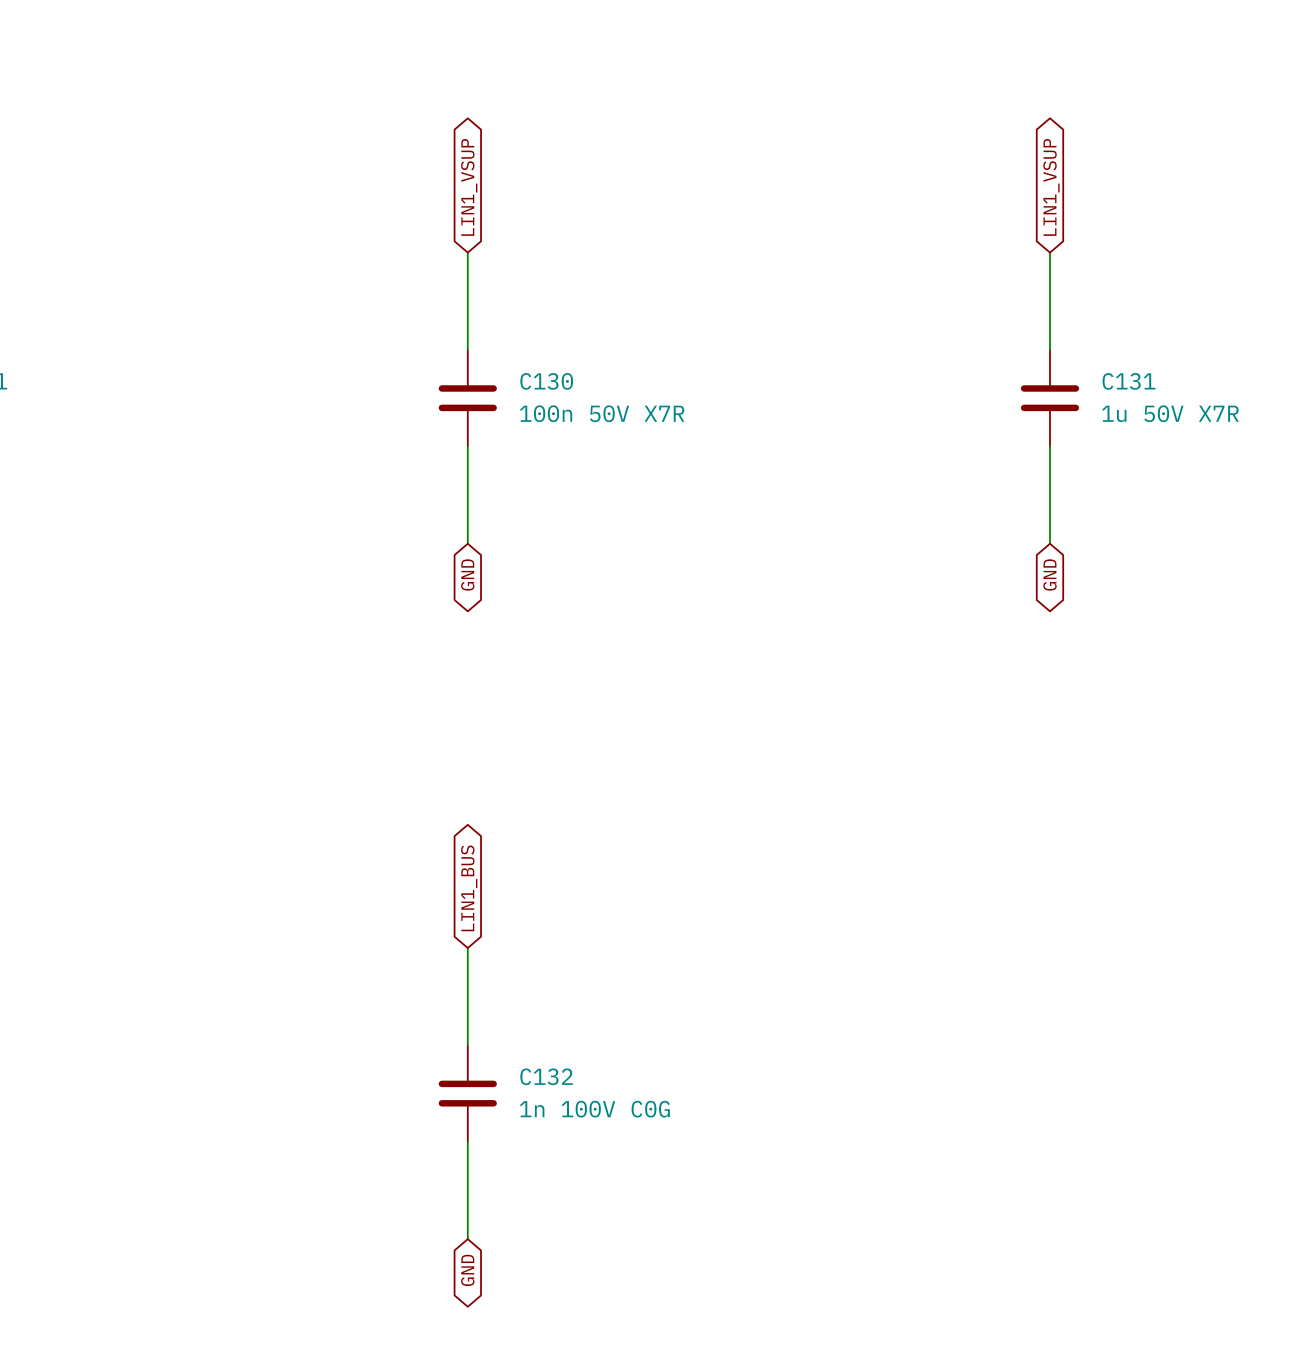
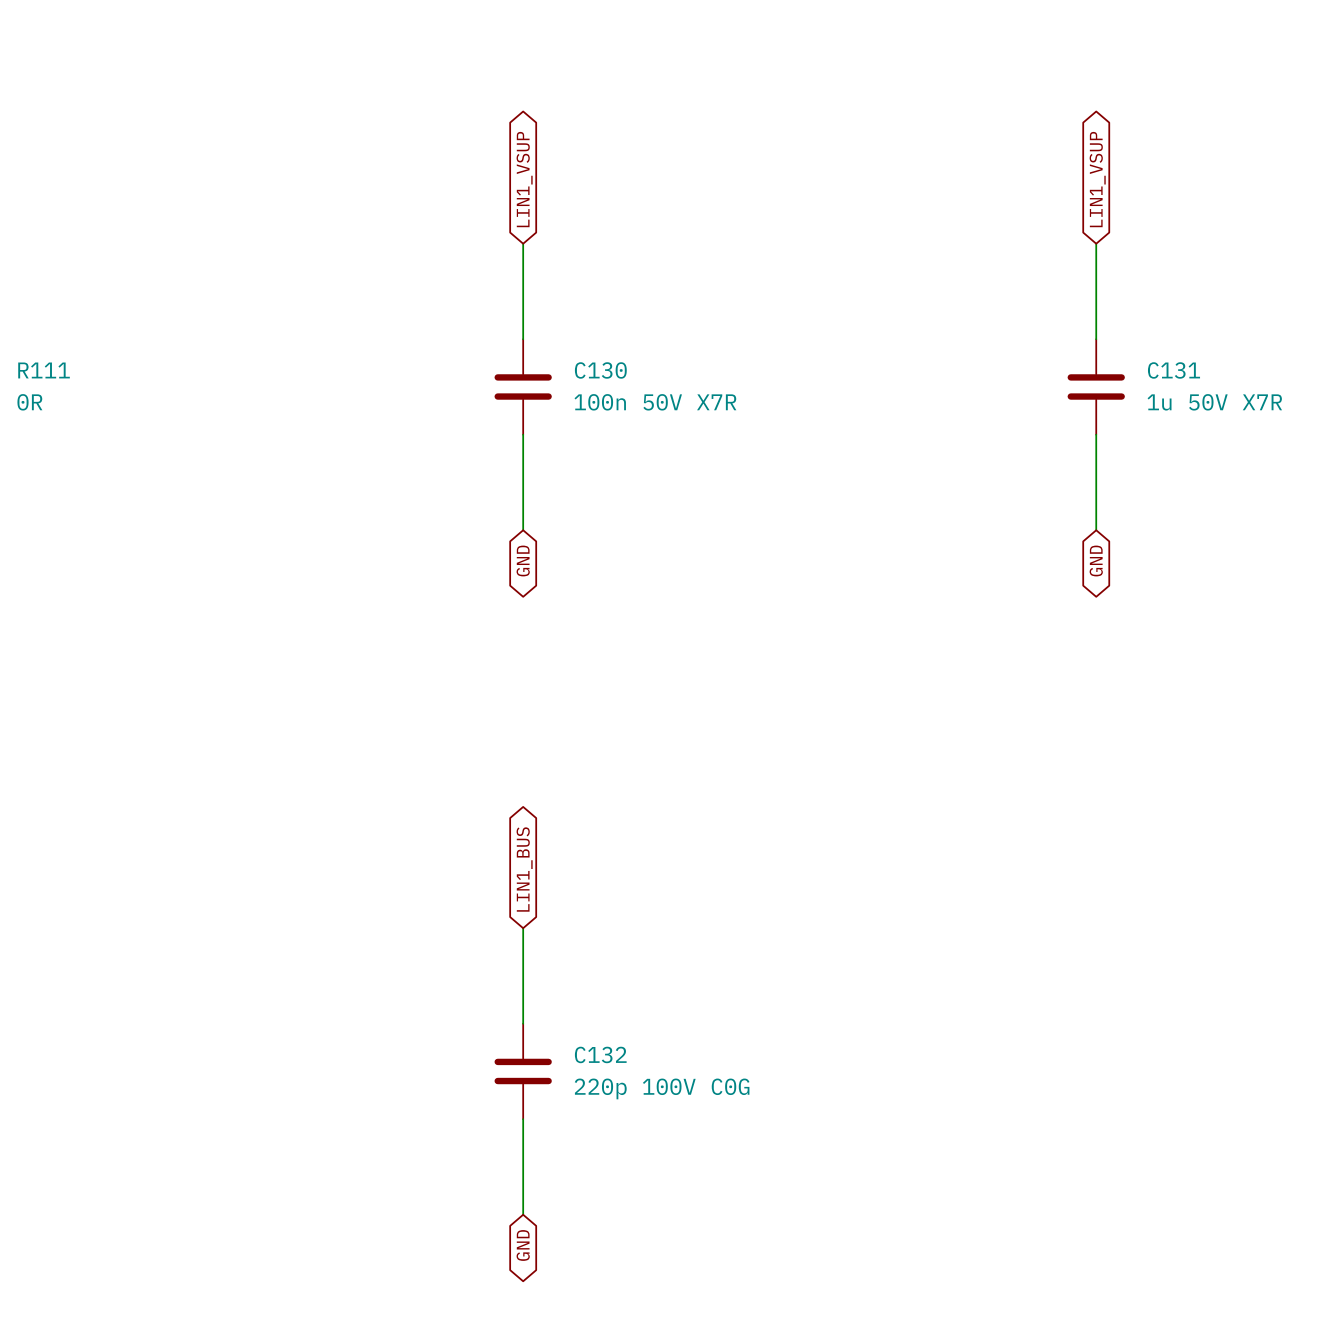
C132 value: 1n 100V C0G (594, 1109) -> 220p 100V C0G (662, 1088)

